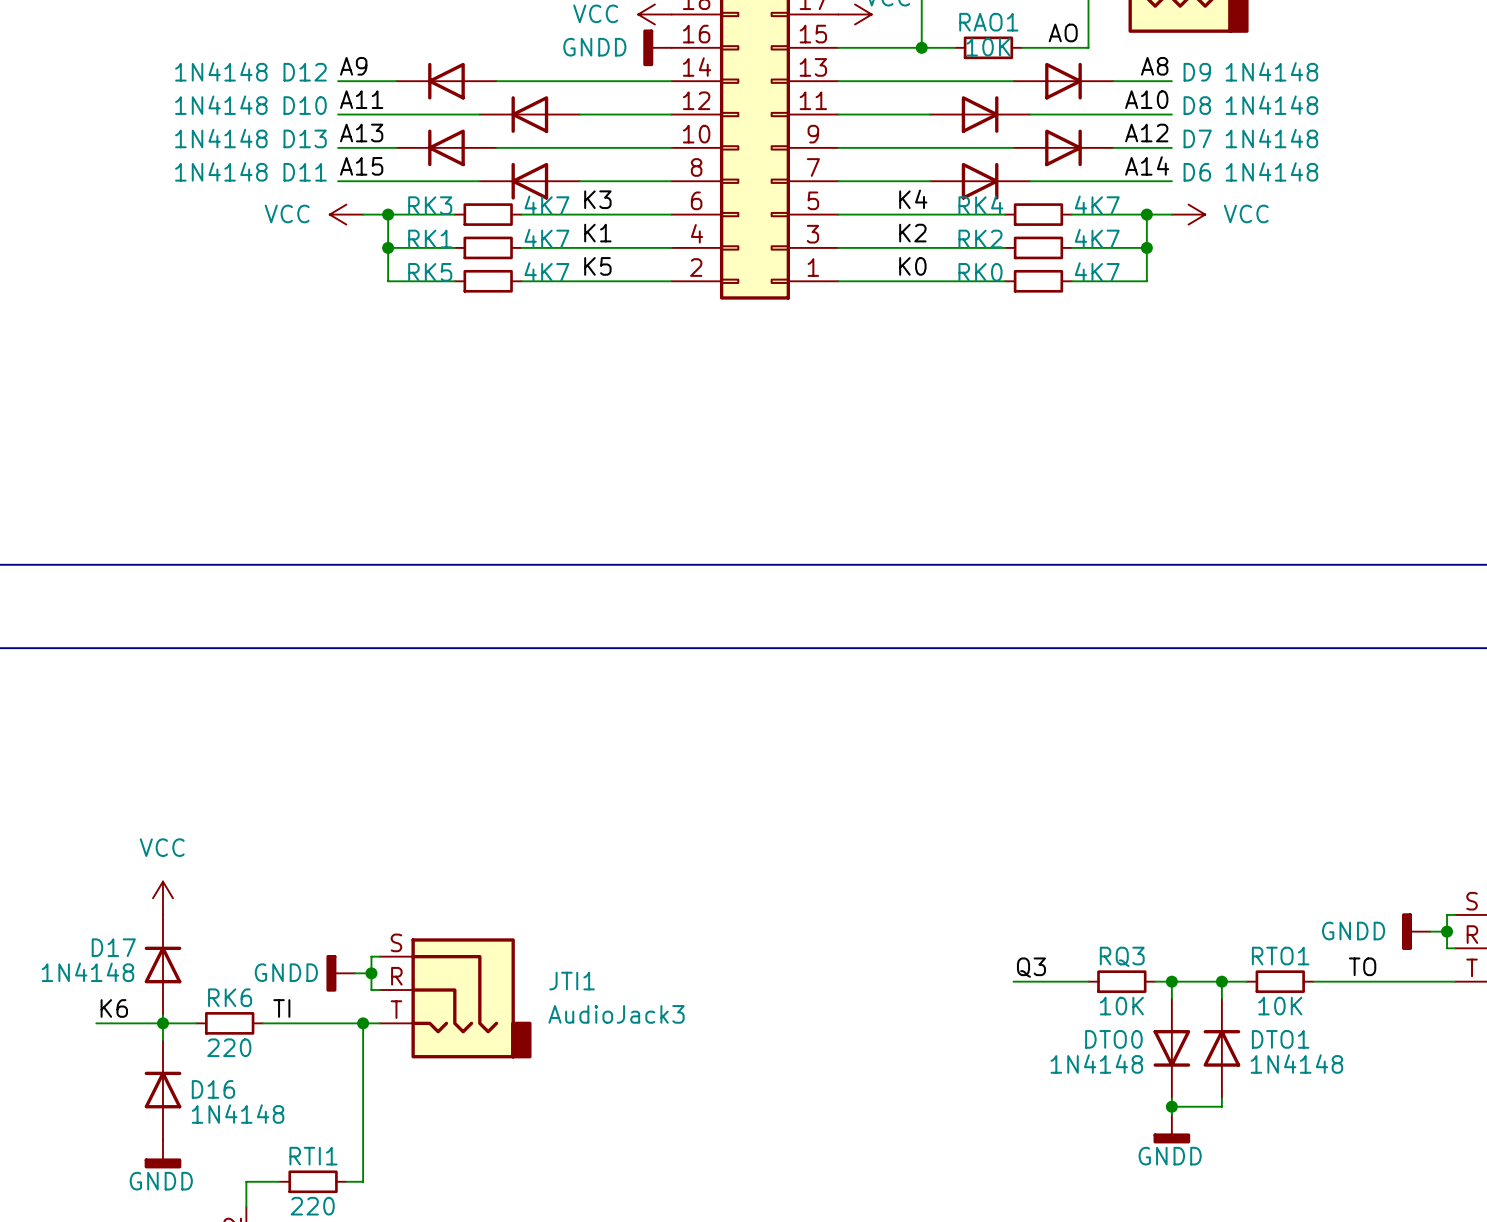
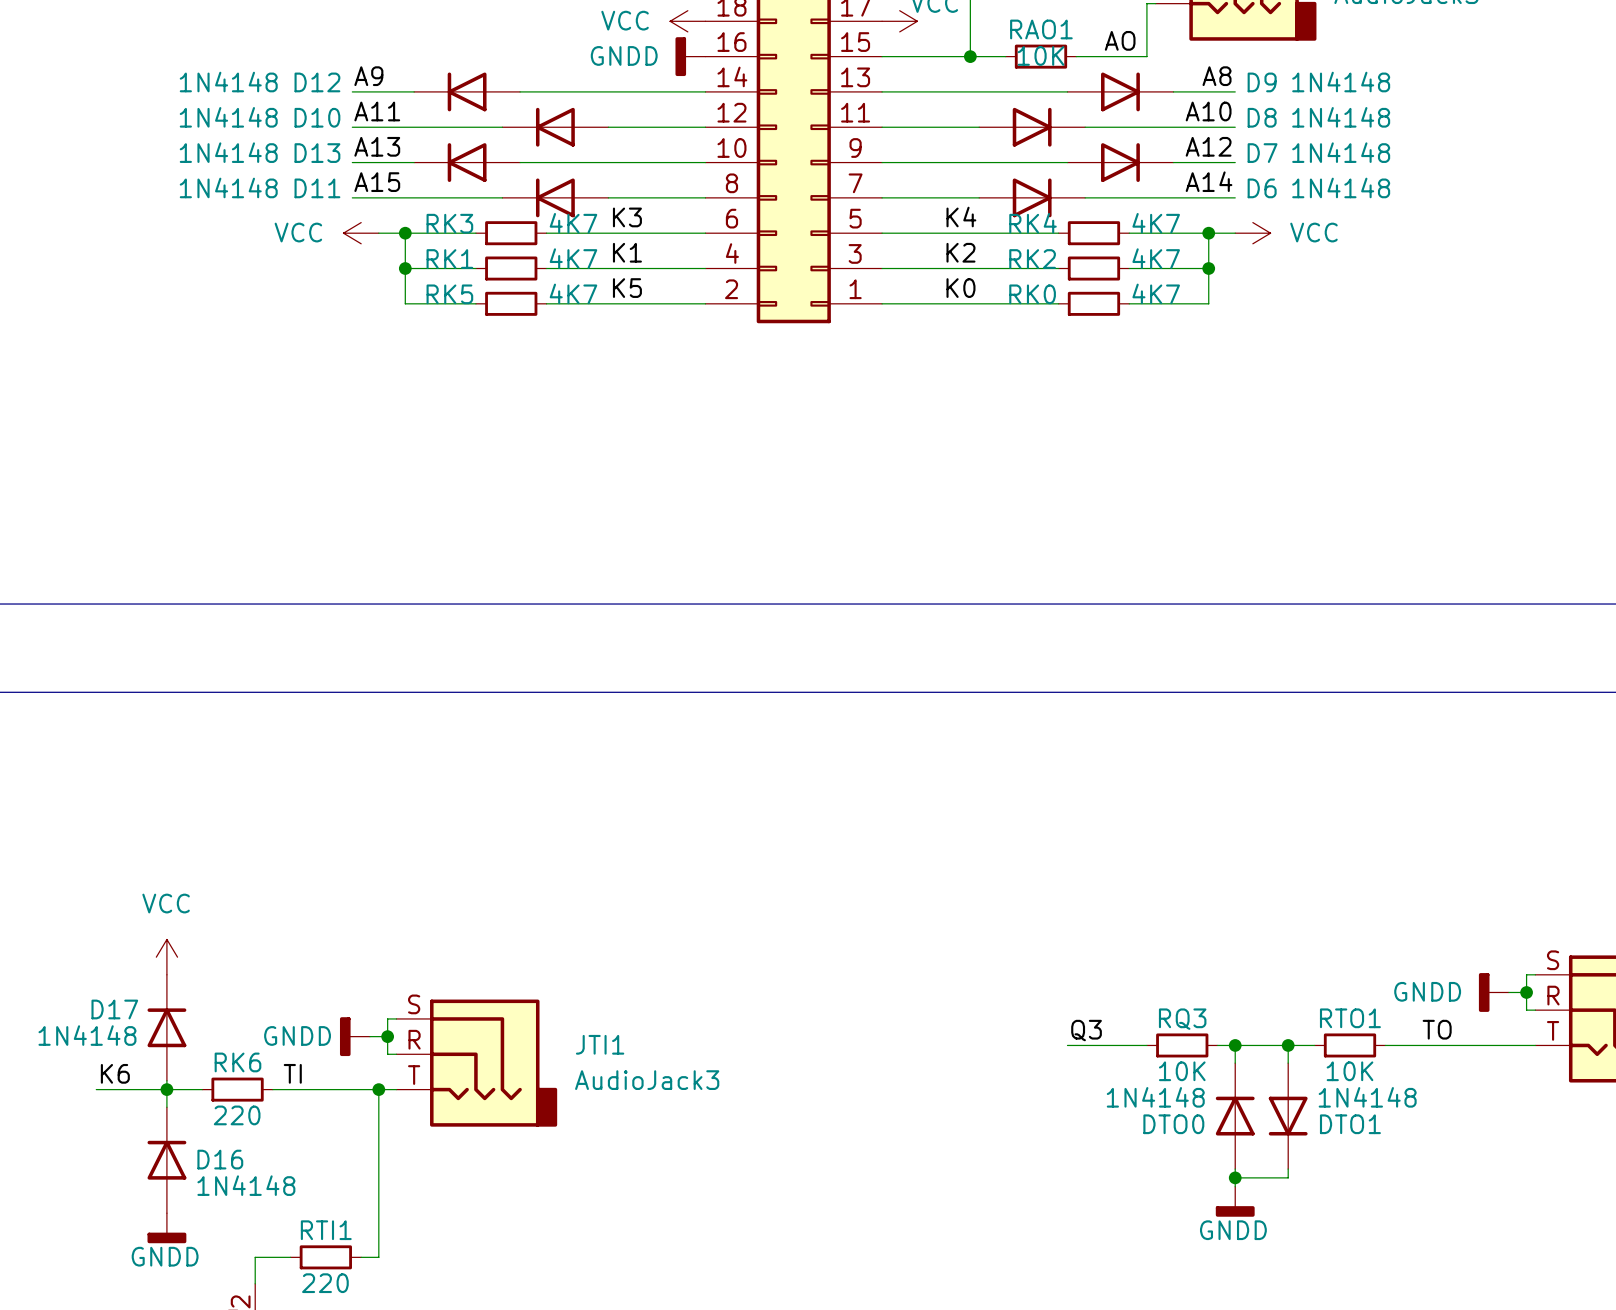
DTO0 rotation: 0° (1171, 1048) -> 180° (1235, 1116)
DTO1 rotation: 0° (1221, 1048) -> 180° (1288, 1116)
DTO0 value position: 1N4148 (1096, 1064) -> 1N4148 (1155, 1097)
DTO1 value position: 1N4148 (1296, 1064) -> 1N4148 (1367, 1097)

